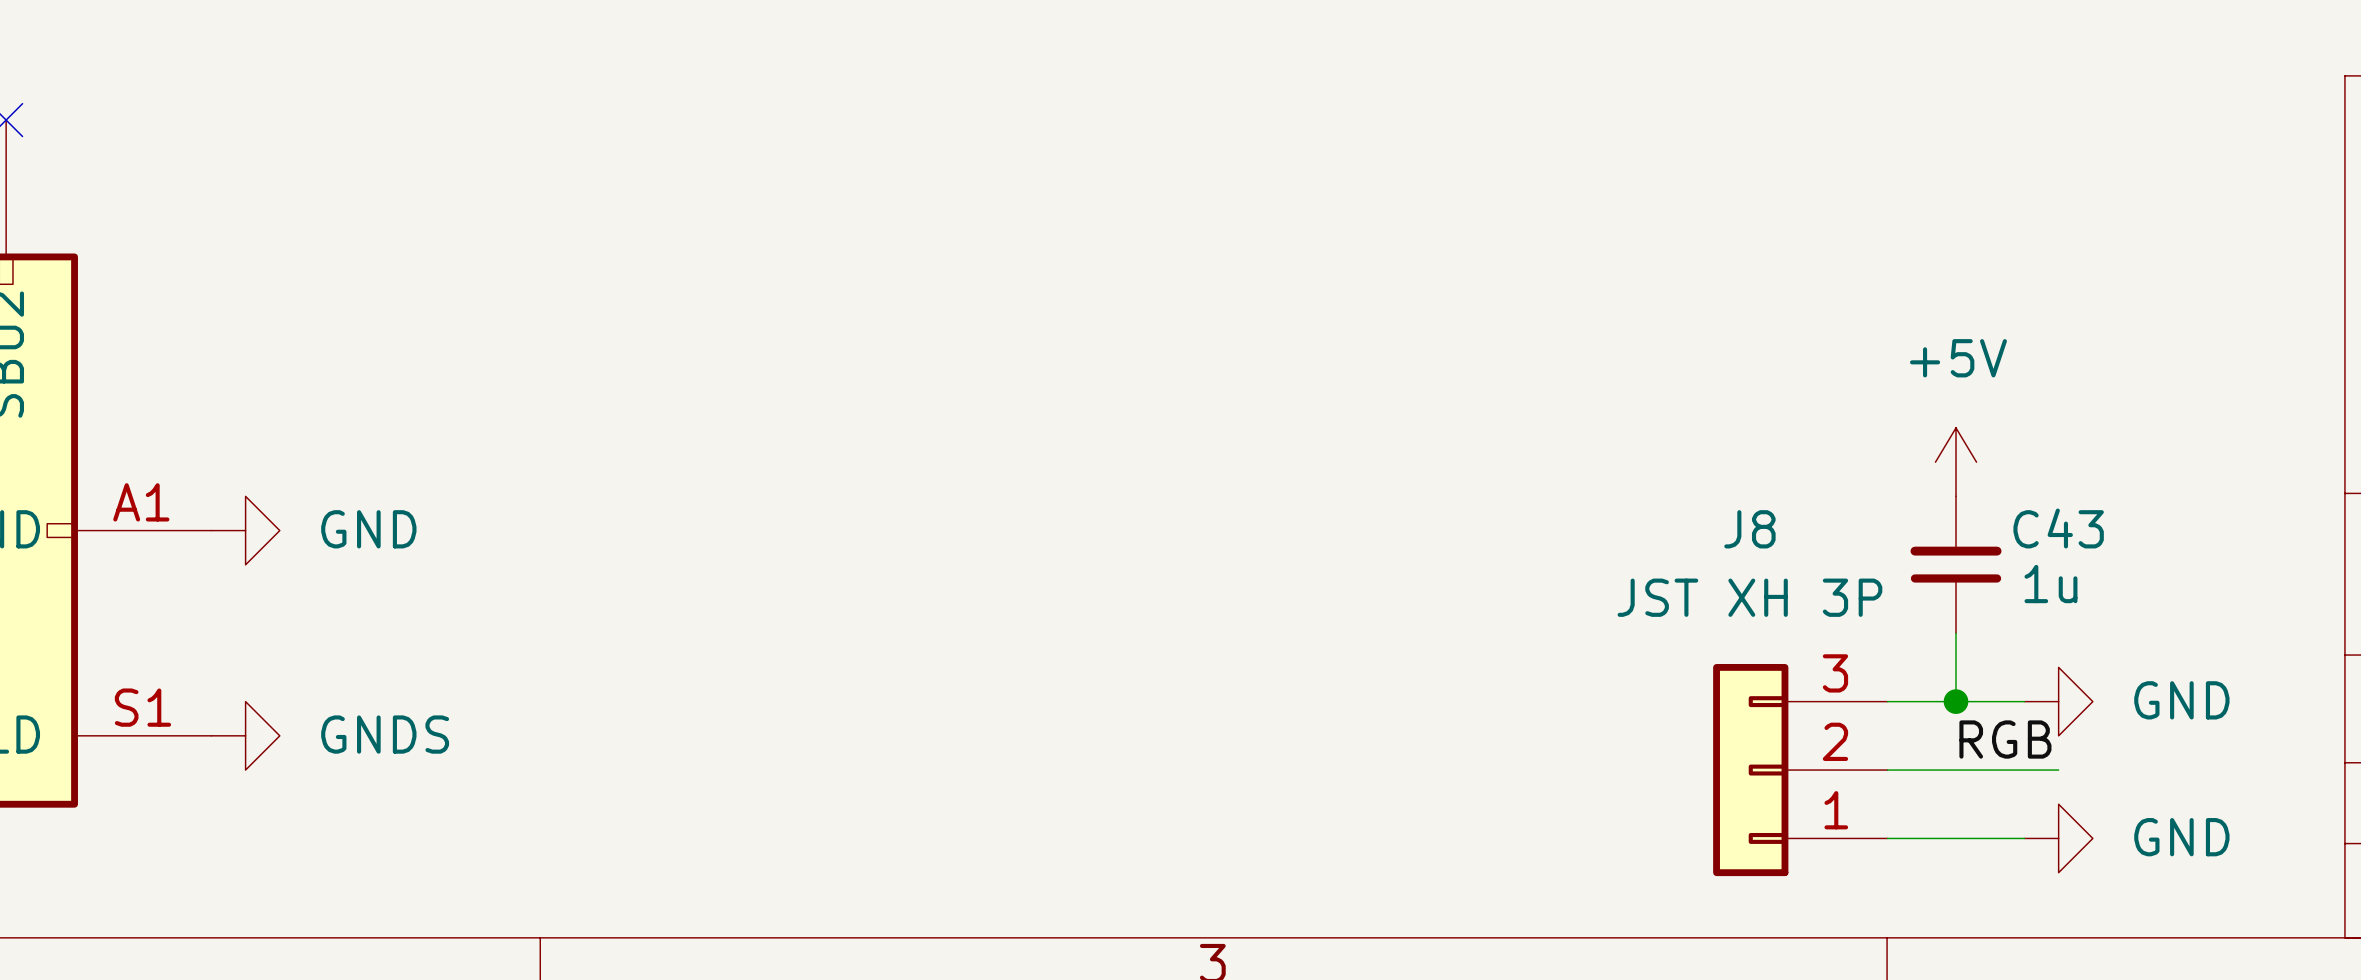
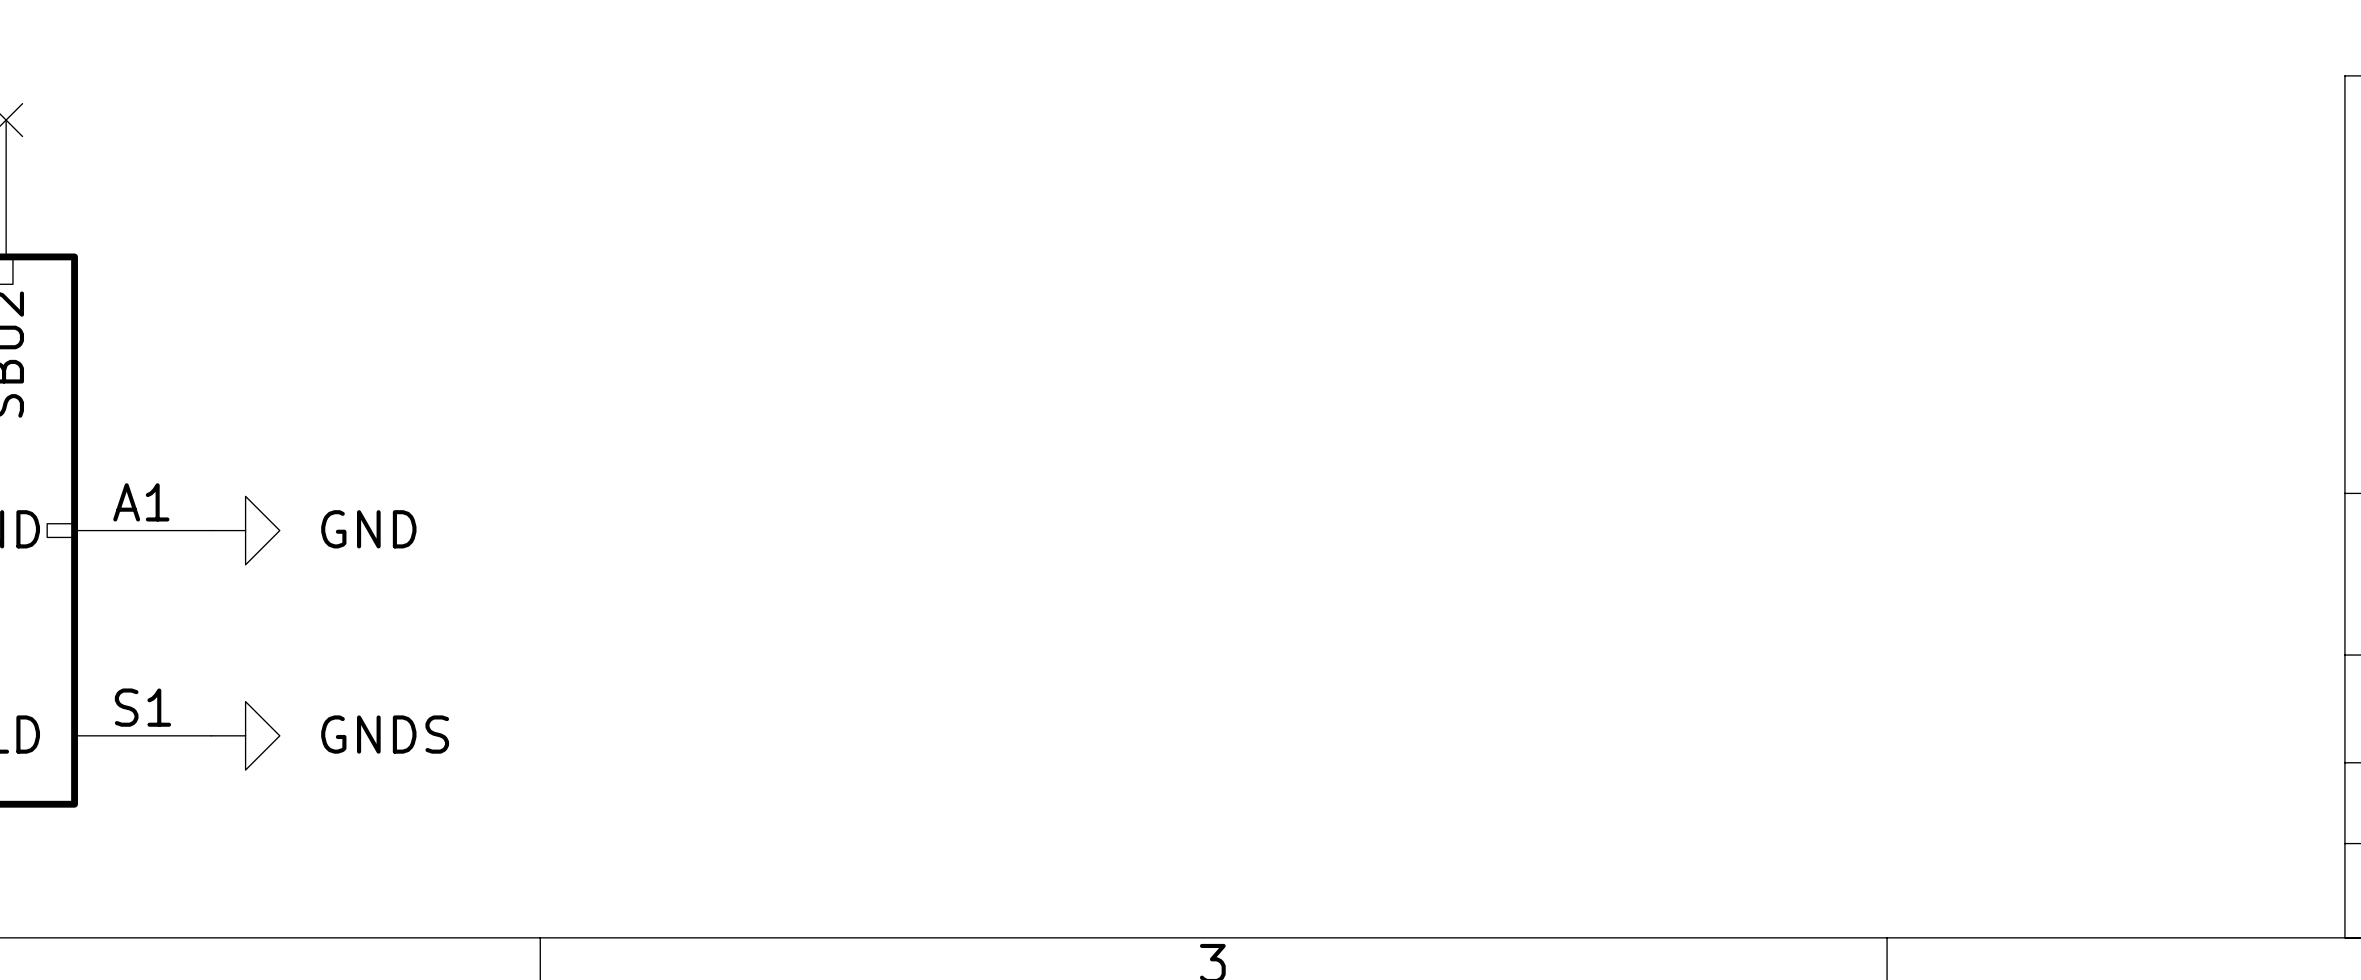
power symbol: +5V (1956, 462) -> none
C43: 1u (1956, 564) -> none
wire: (1956, 633) (1956, 701) -> none
wire: (1887, 701) (2024, 701) -> none
junction: (1956, 701) -> none
power symbol: GND (2058, 701) -> none
label: RGB (2005, 739) -> none
J8: JST XH 3P (1800, 770) -> none
wire: (1887, 770) (2058, 770) -> none
wire: (1887, 838) (2024, 838) -> none
power symbol: GND (2058, 838) -> none

